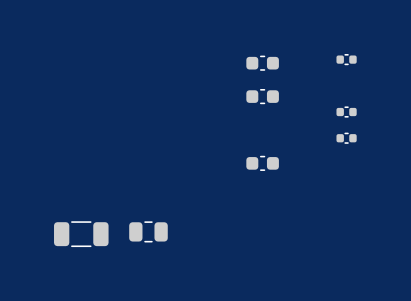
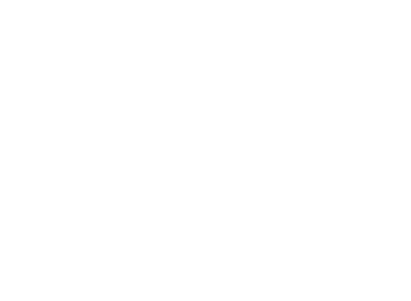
part: (346, 59) -> none
part: (262, 63) -> none
part: (262, 96) -> none
part: (346, 112) -> none
part: (346, 138) -> none
part: (262, 163) -> none
part: (148, 231) -> none
part: (81, 234) -> none

